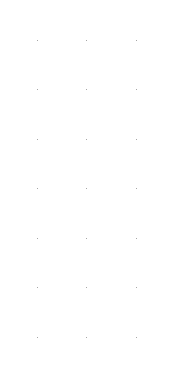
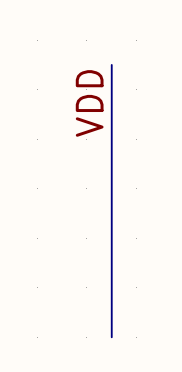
wire: none -> (111, 64) (111, 337)
label: none -> VDD (89, 103)

